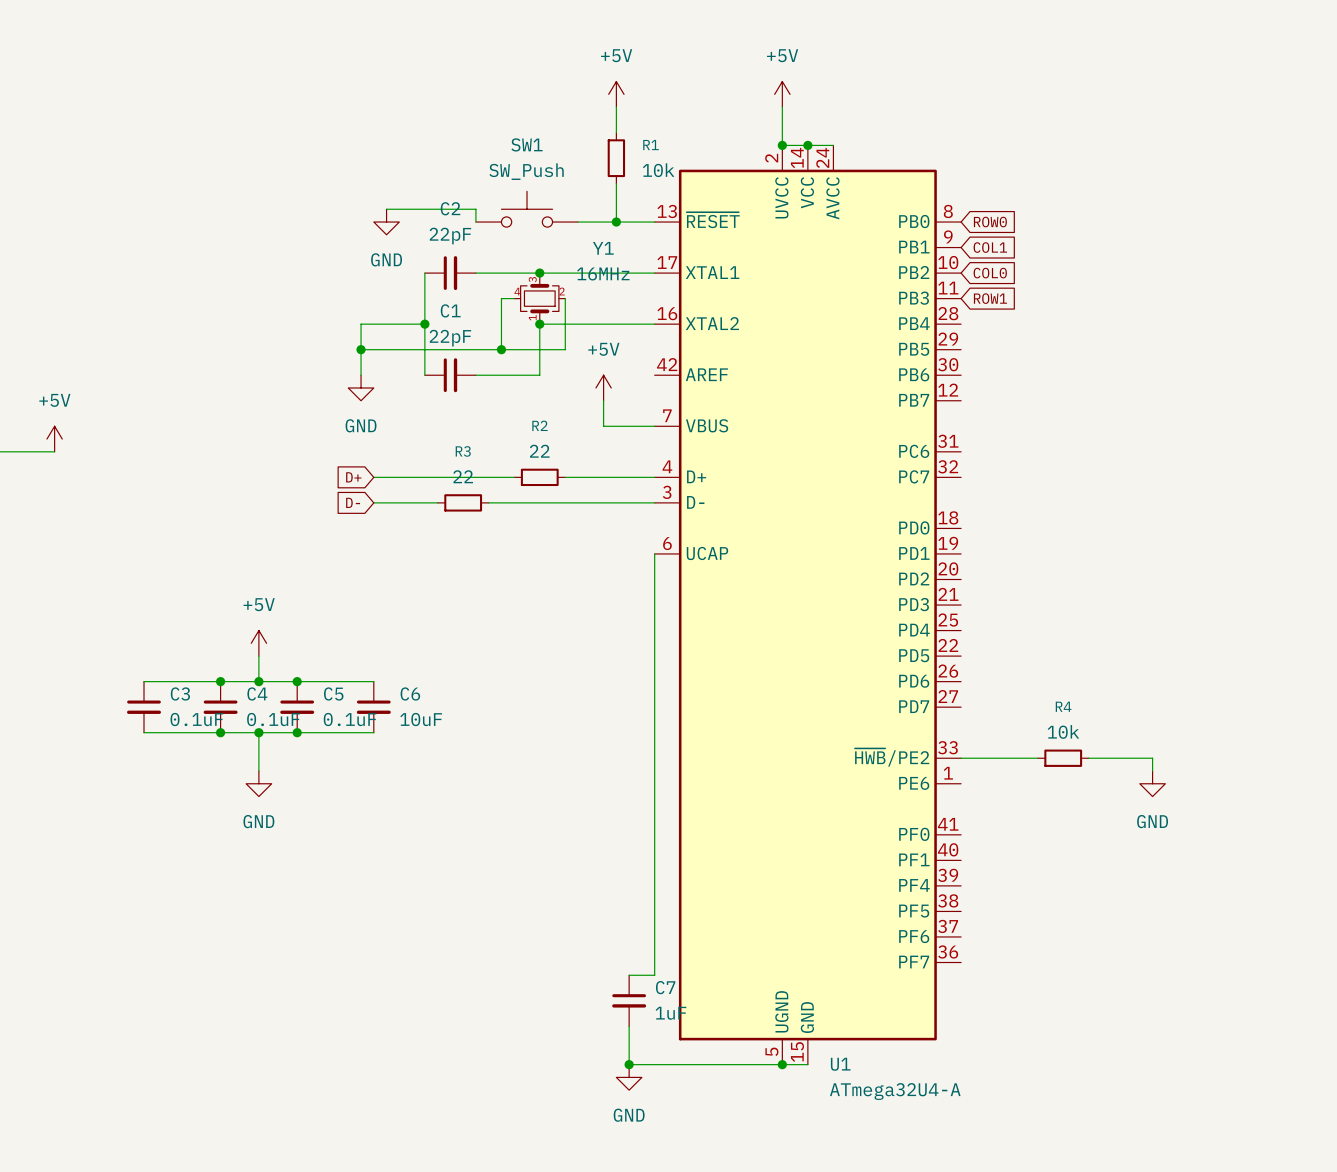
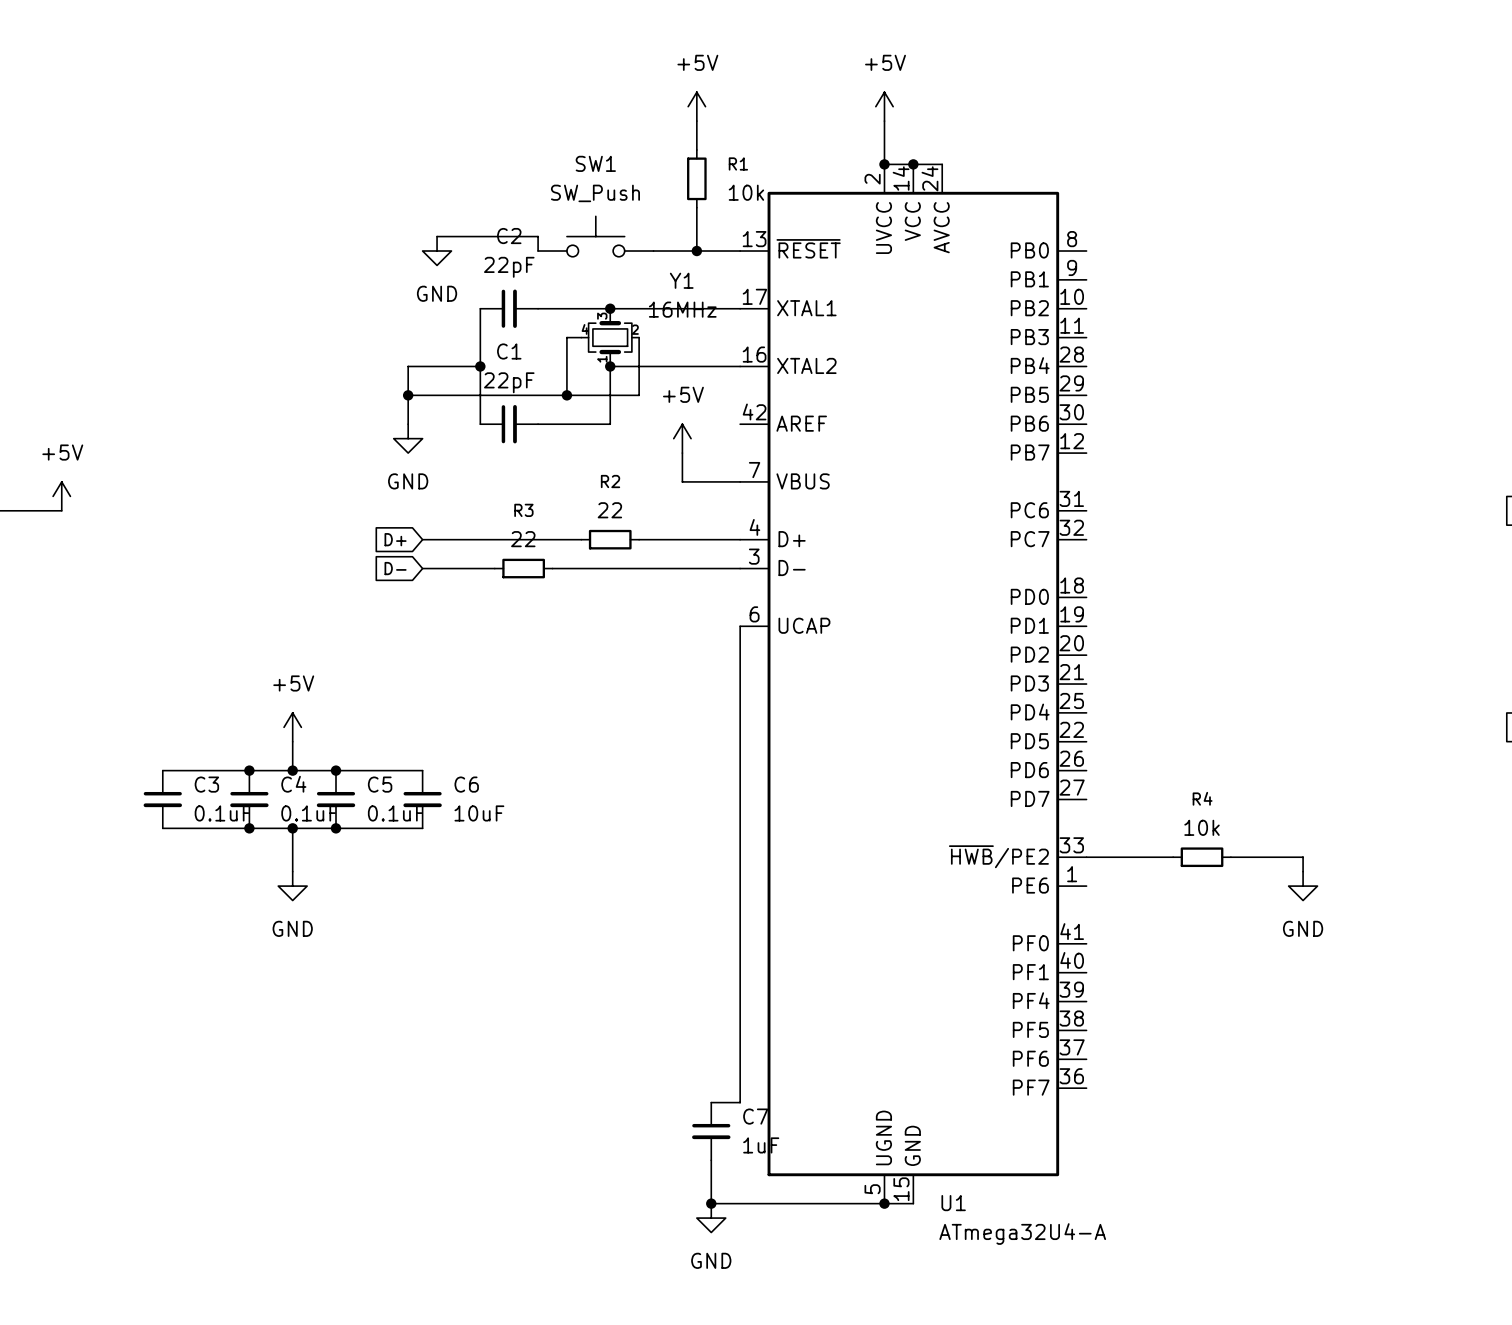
global label: ROW0 (990, 222) -> none
global label: COL1 (990, 247) -> none
global label: COL0 (990, 273) -> none
global label: ROW1 (990, 298) -> none

